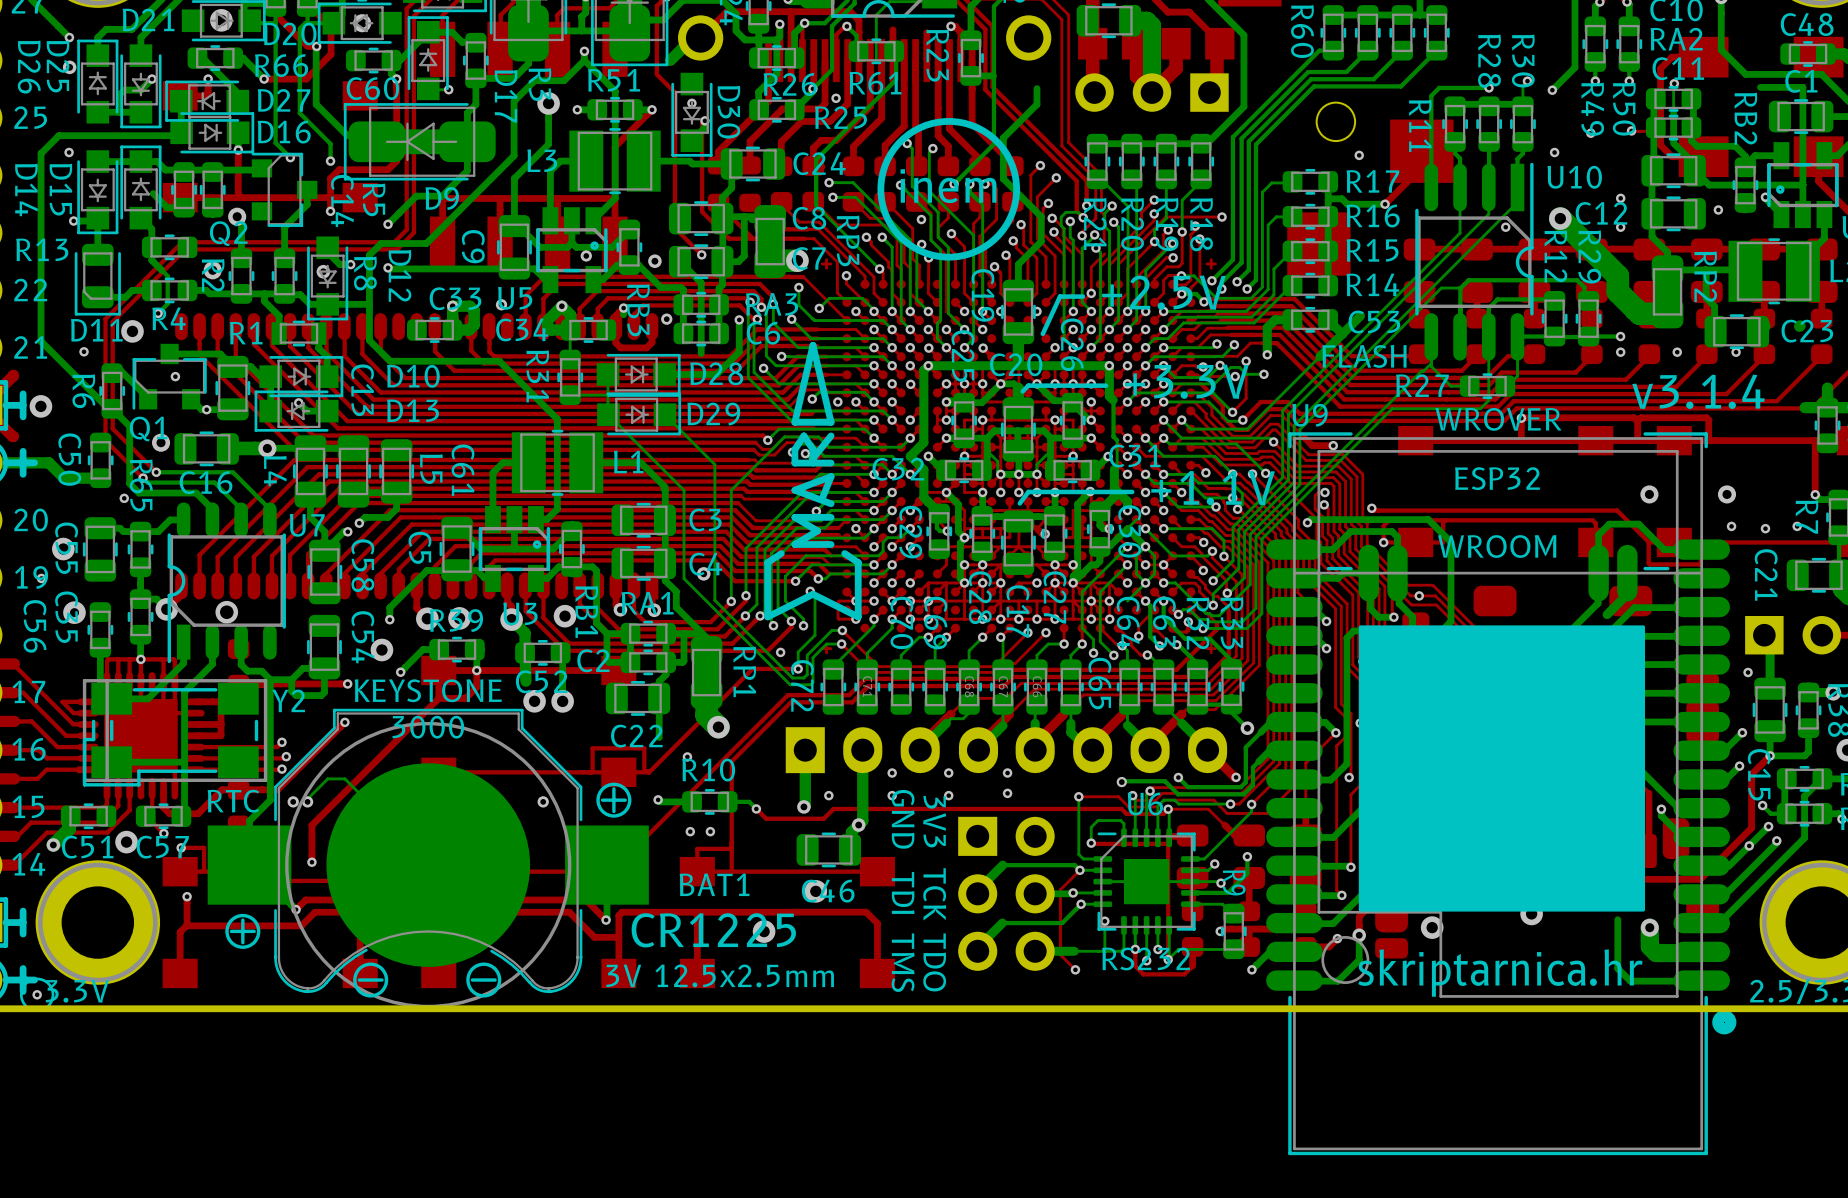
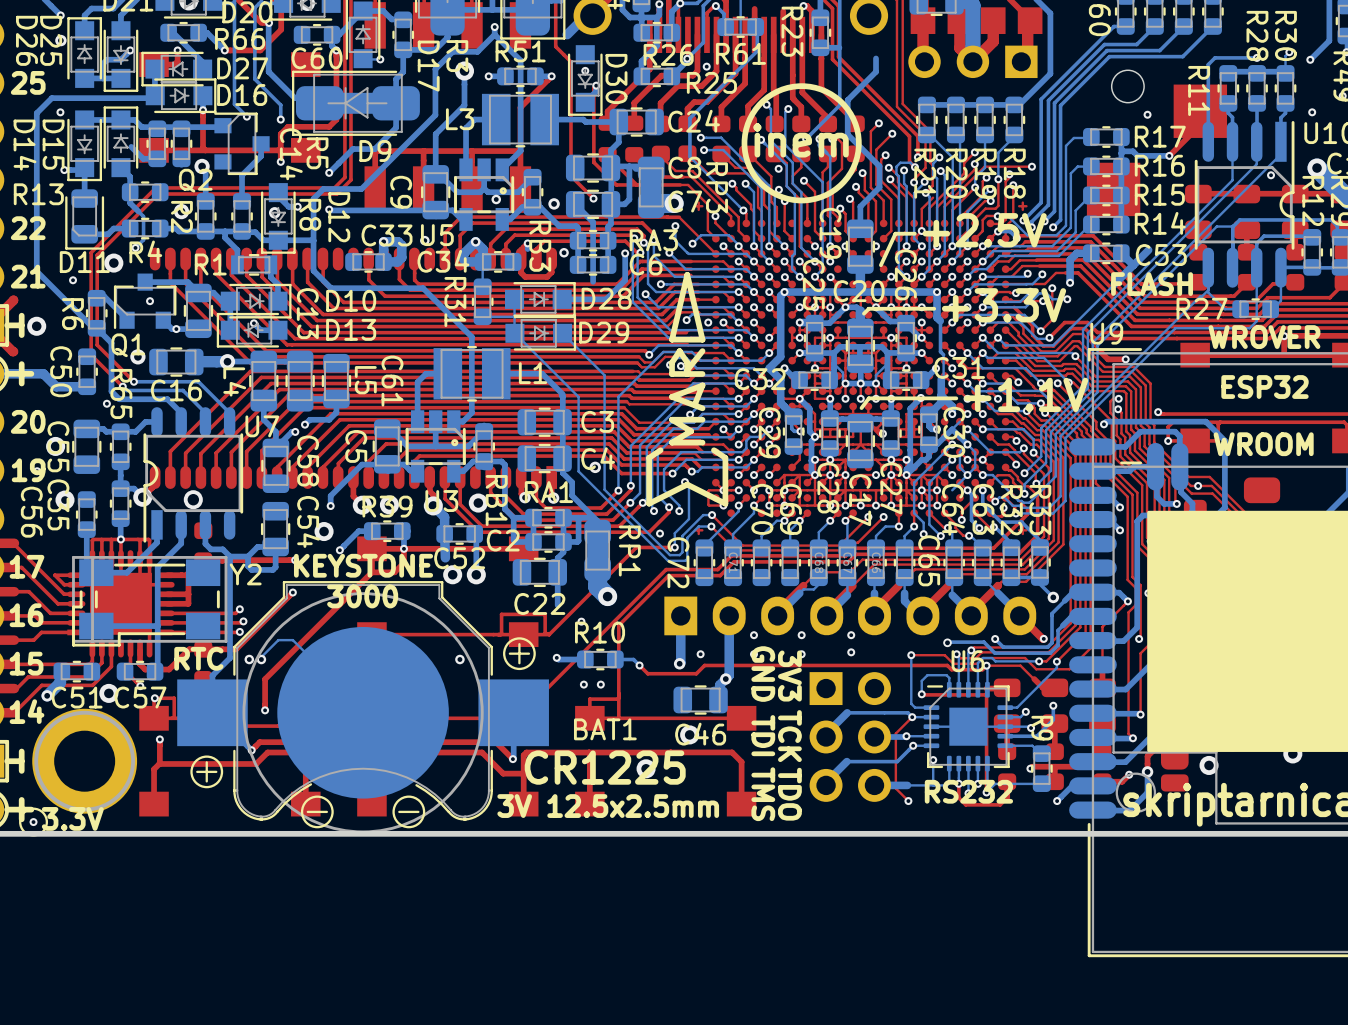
BAT1 footprint: [207, 708, 649, 1009] -> [177, 581, 549, 834]
drawing: [596, 782, 632, 818] -> none
line: (613, 788) (613, 811) -> none
line: (625, 800) (602, 800) -> none
drawing: [225, 913, 261, 949] -> none
line: (242, 920) (242, 942) -> none
line: (254, 931) (231, 931) -> none
drawing: [353, 962, 389, 998] -> none
drawing: [466, 962, 502, 998] -> none
line: (381, 980) (359, 980) -> none
line: (495, 980) (472, 980) -> none

